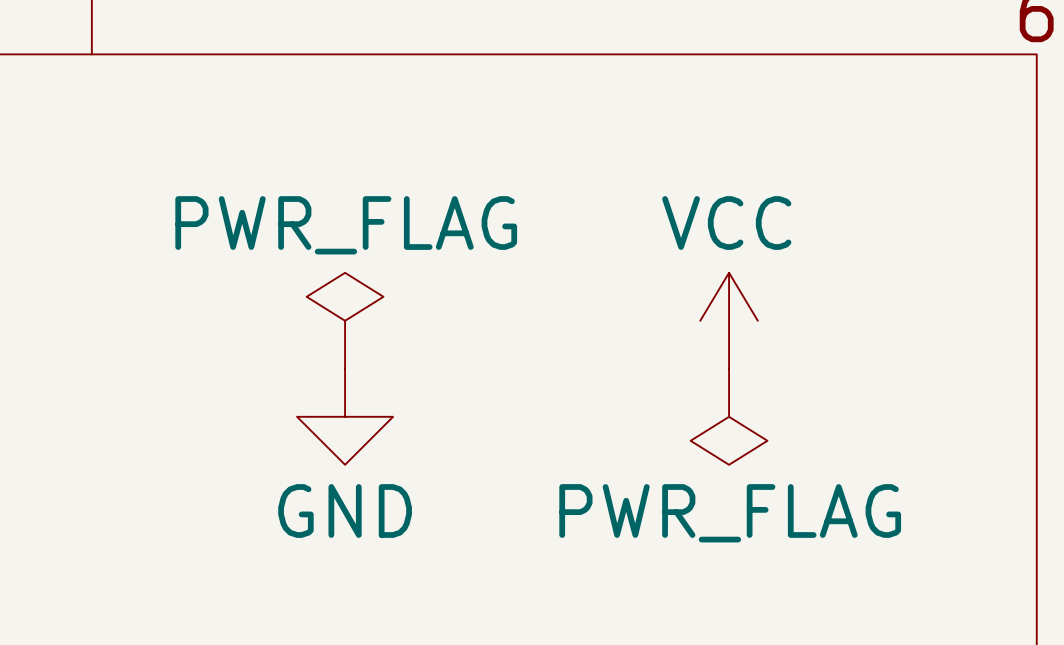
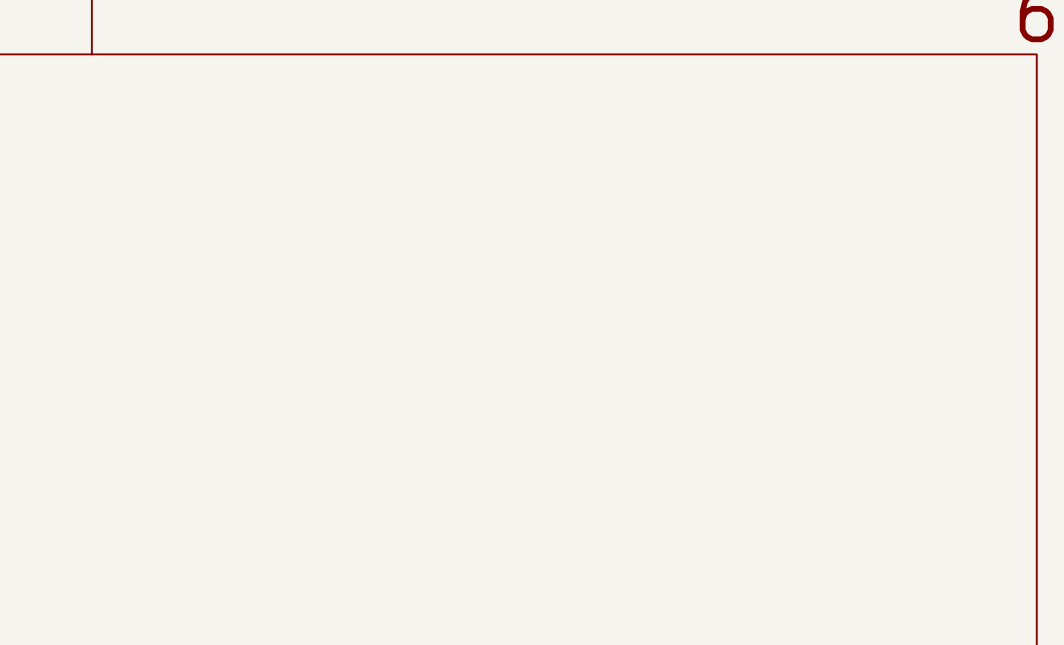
power symbol: PWR_FLAG (345, 320) -> none
power symbol: VCC (729, 320) -> none
power symbol: GND (345, 416) -> none
power symbol: PWR_FLAG (729, 416) -> none

